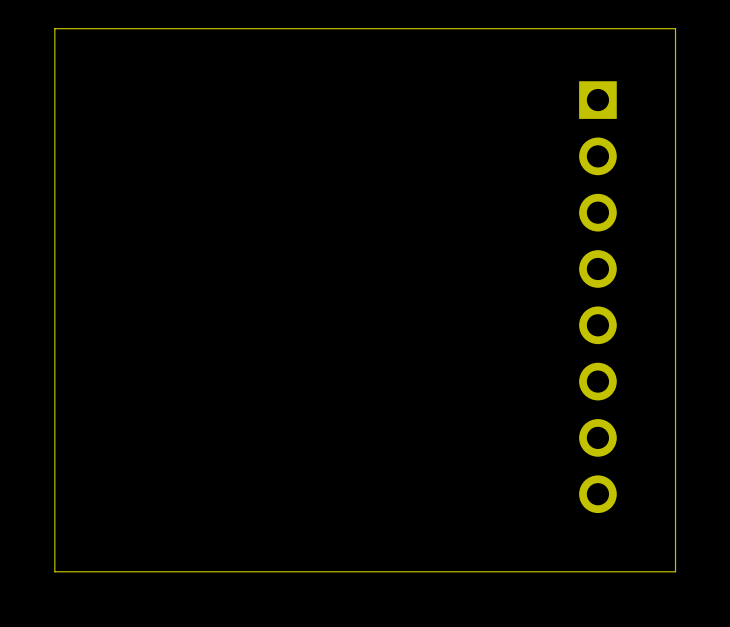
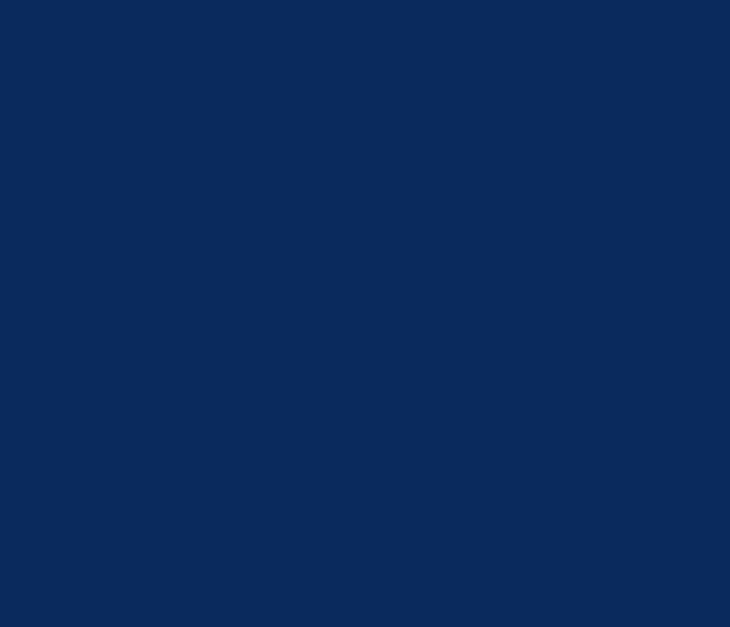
board edge: (675, 28) (54, 28) (54, 571) (675, 571) (675, 28) -> none
part: (597, 297) -> none

